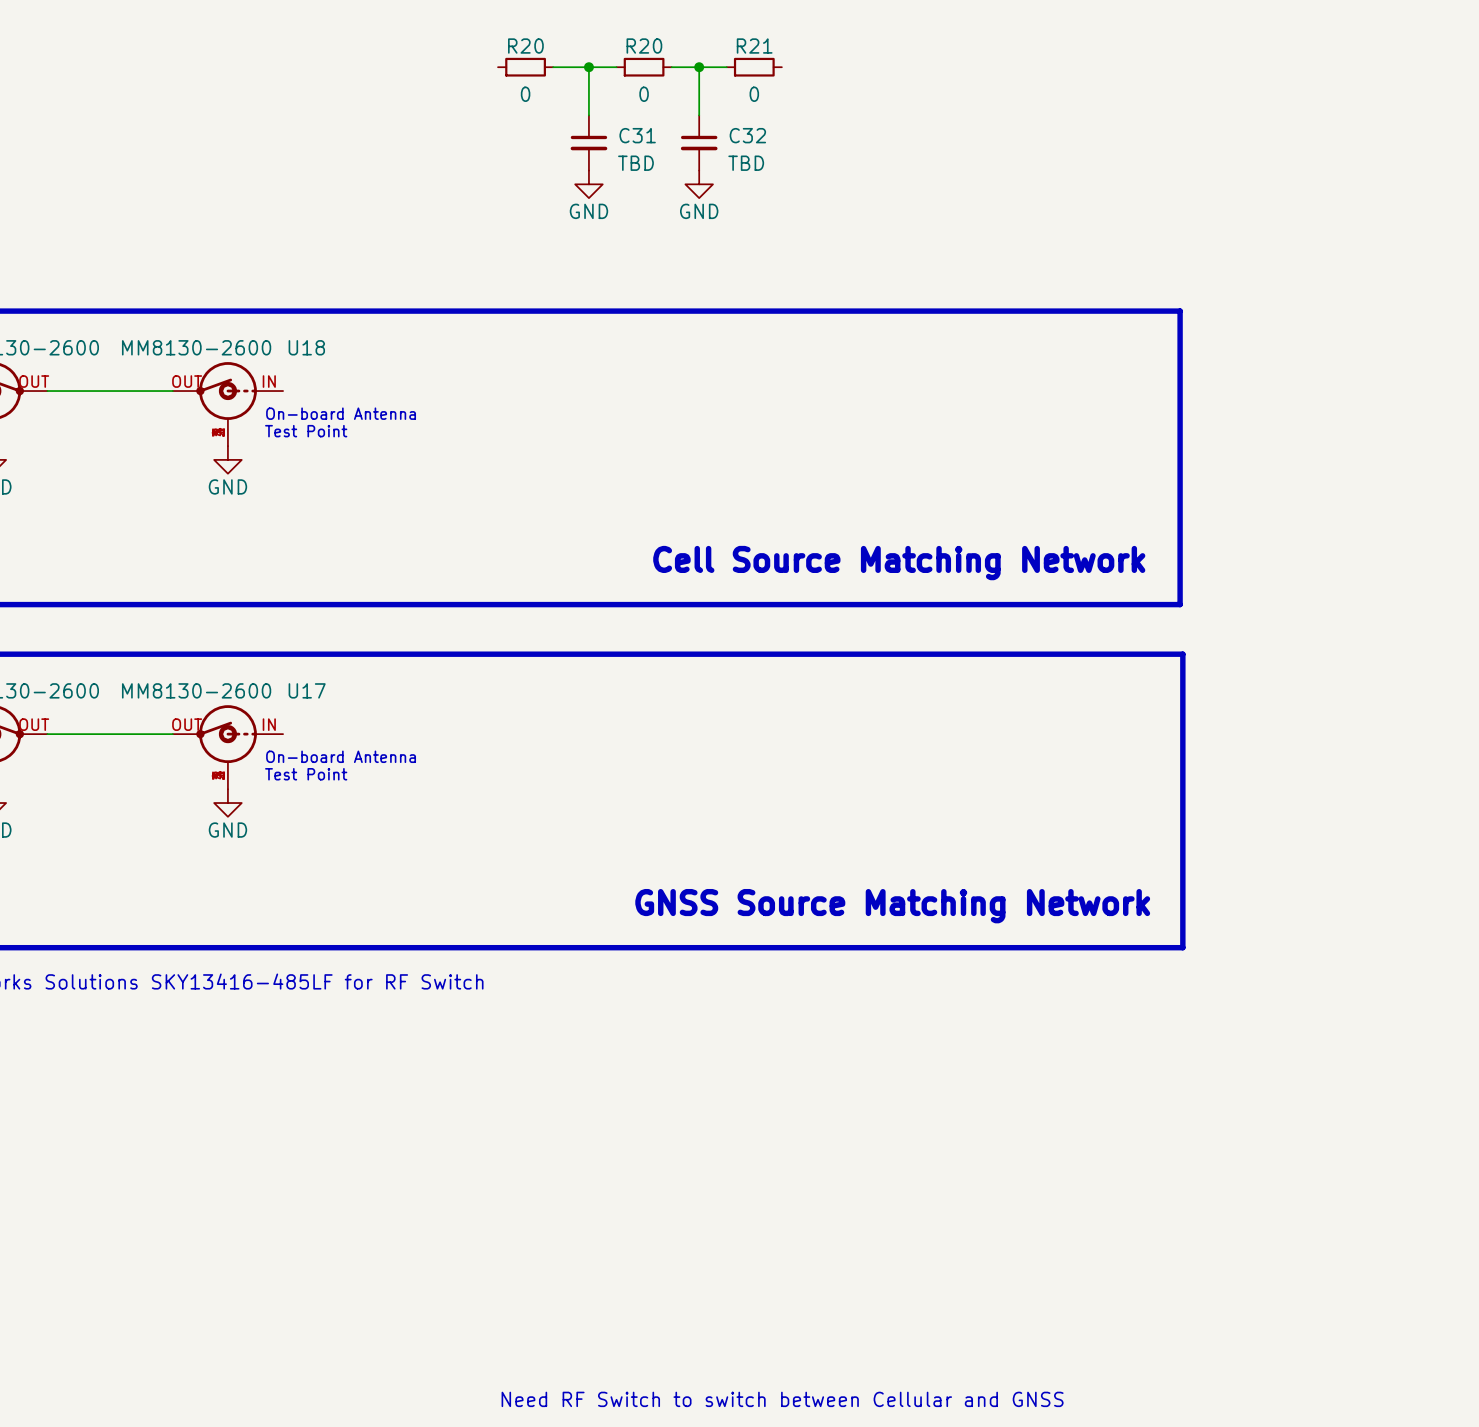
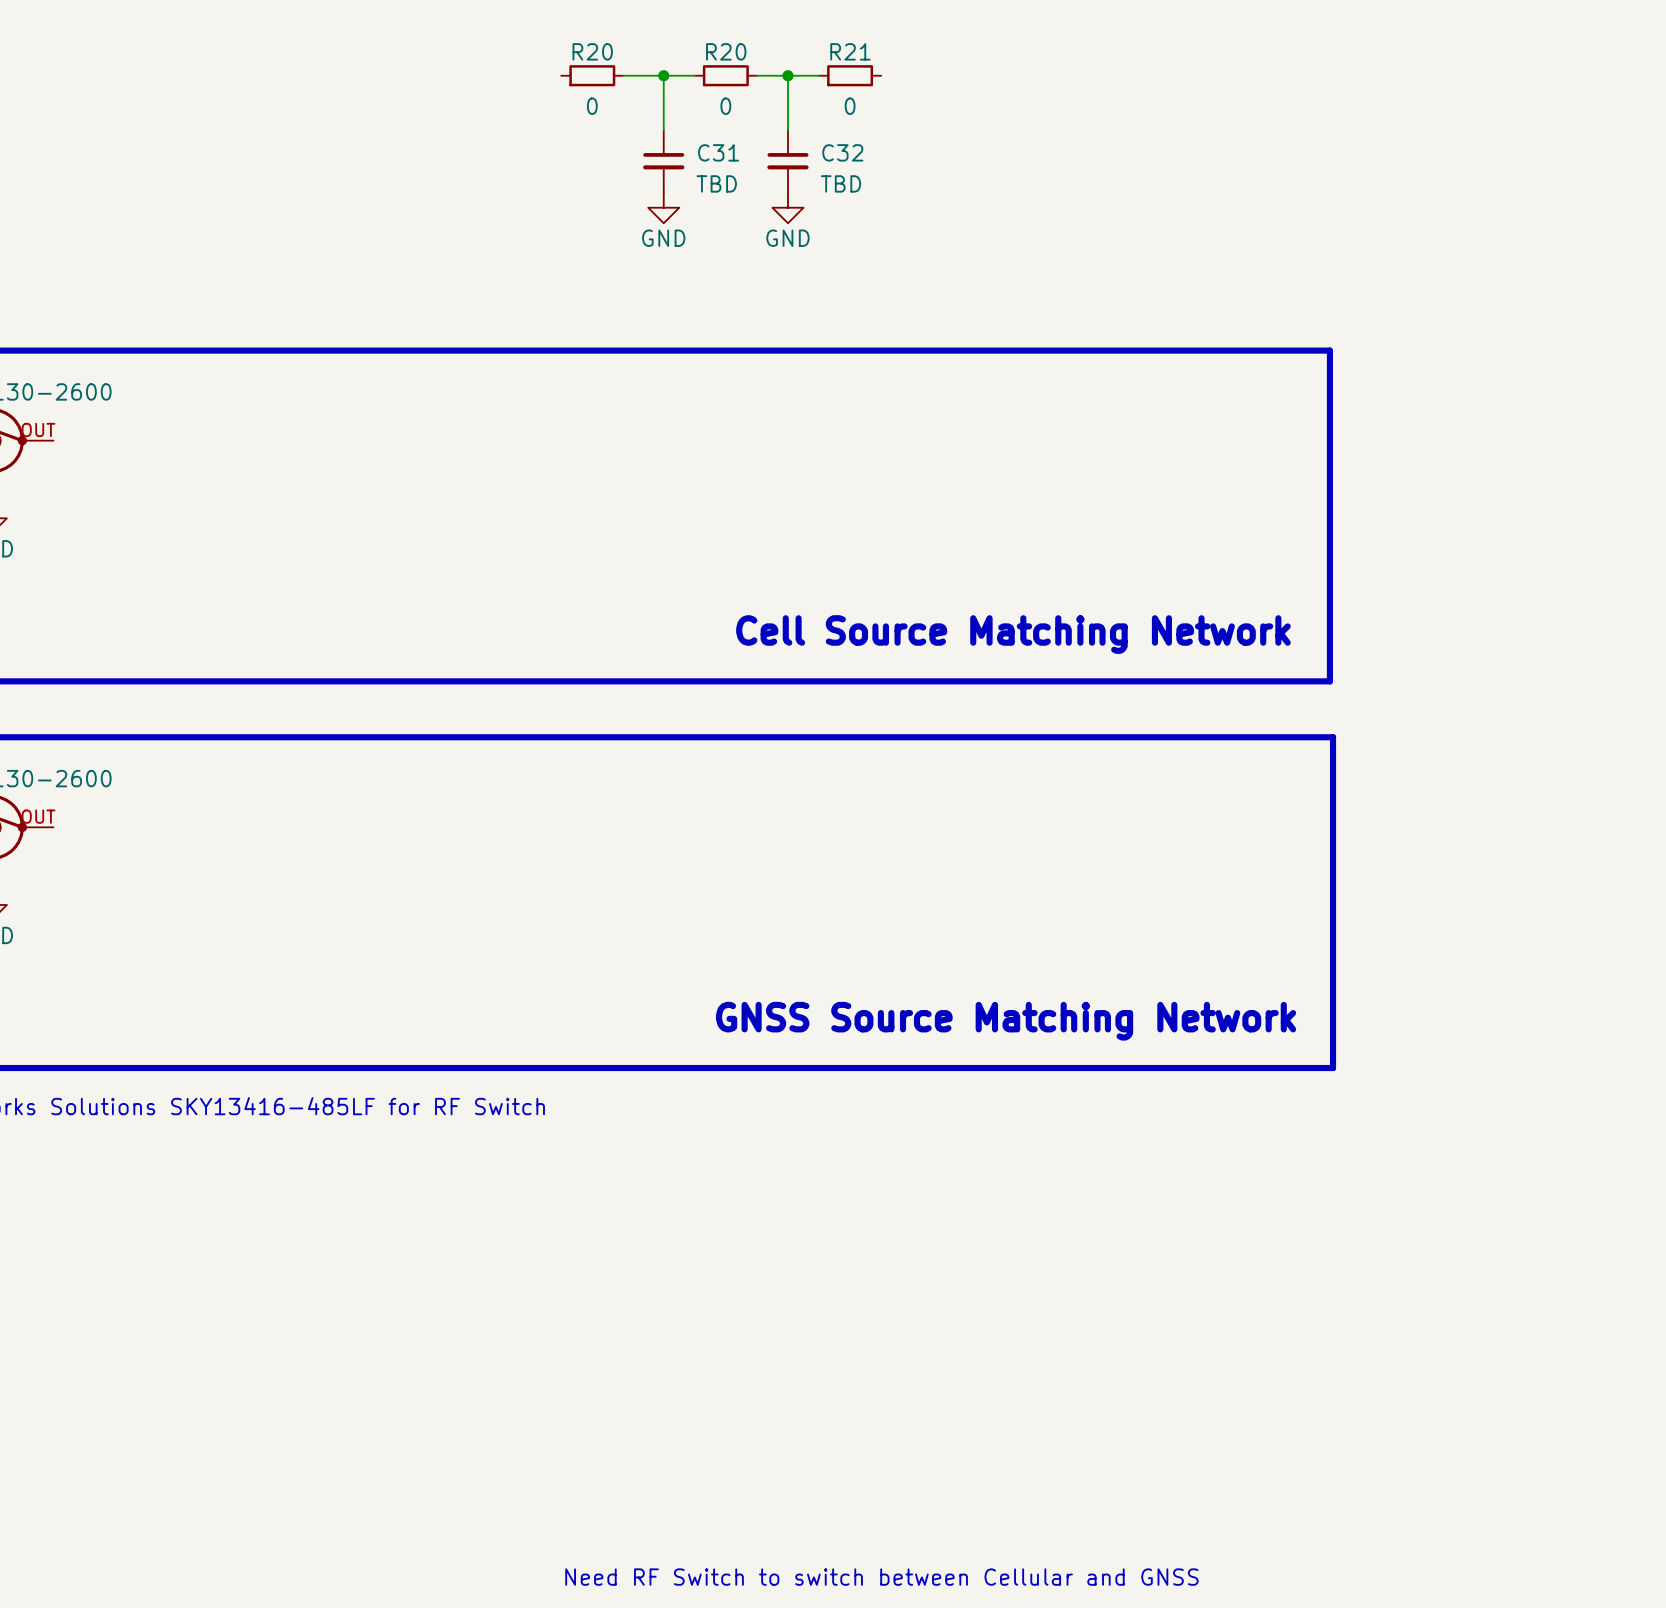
wire: (47, 391) (172, 391) -> none
U18: MM8130-2600 (227, 404) -> none
text: On-board Antenna (341, 413) -> none
text: Test Point (306, 431) -> none
power symbol: GND (227, 459) -> none
wire: (47, 734) (172, 734) -> none
U17: MM8130-2600 (227, 747) -> none
text: On-board Antenna (341, 756) -> none
text: Test Point (306, 774) -> none
power symbol: GND (227, 803) -> none

